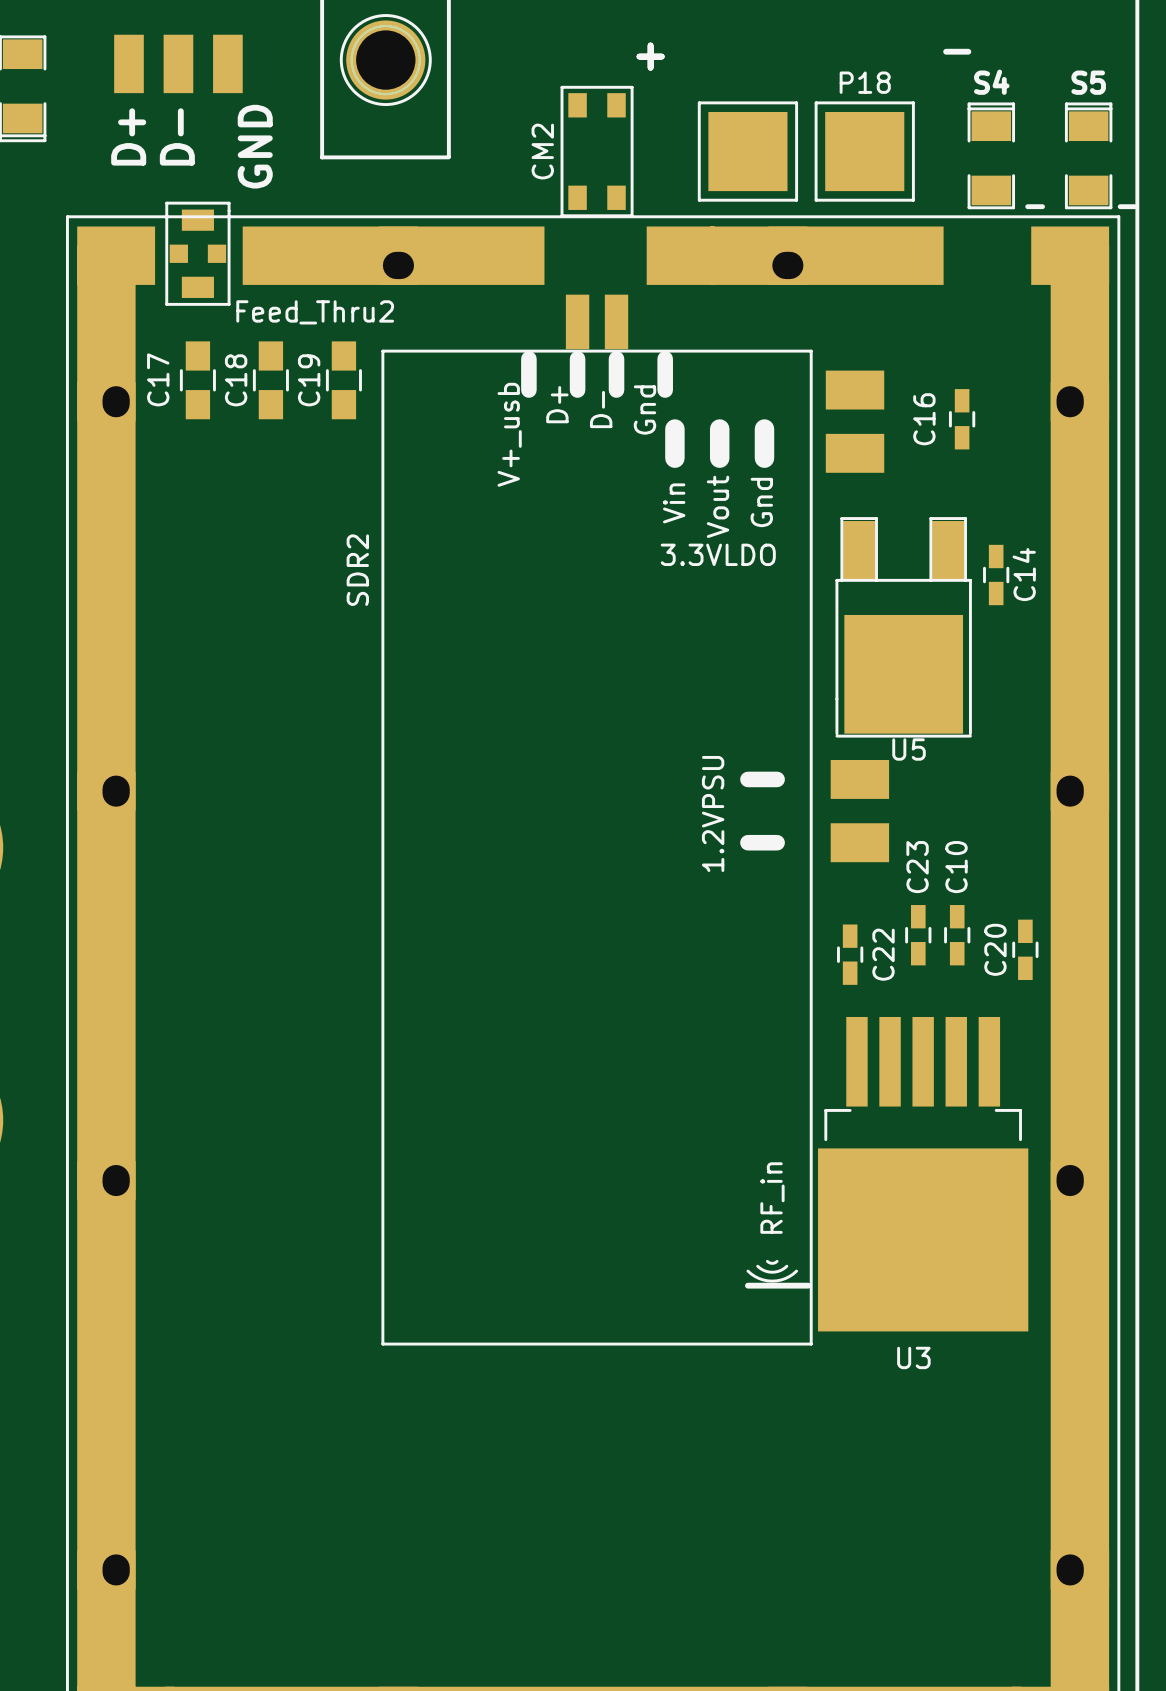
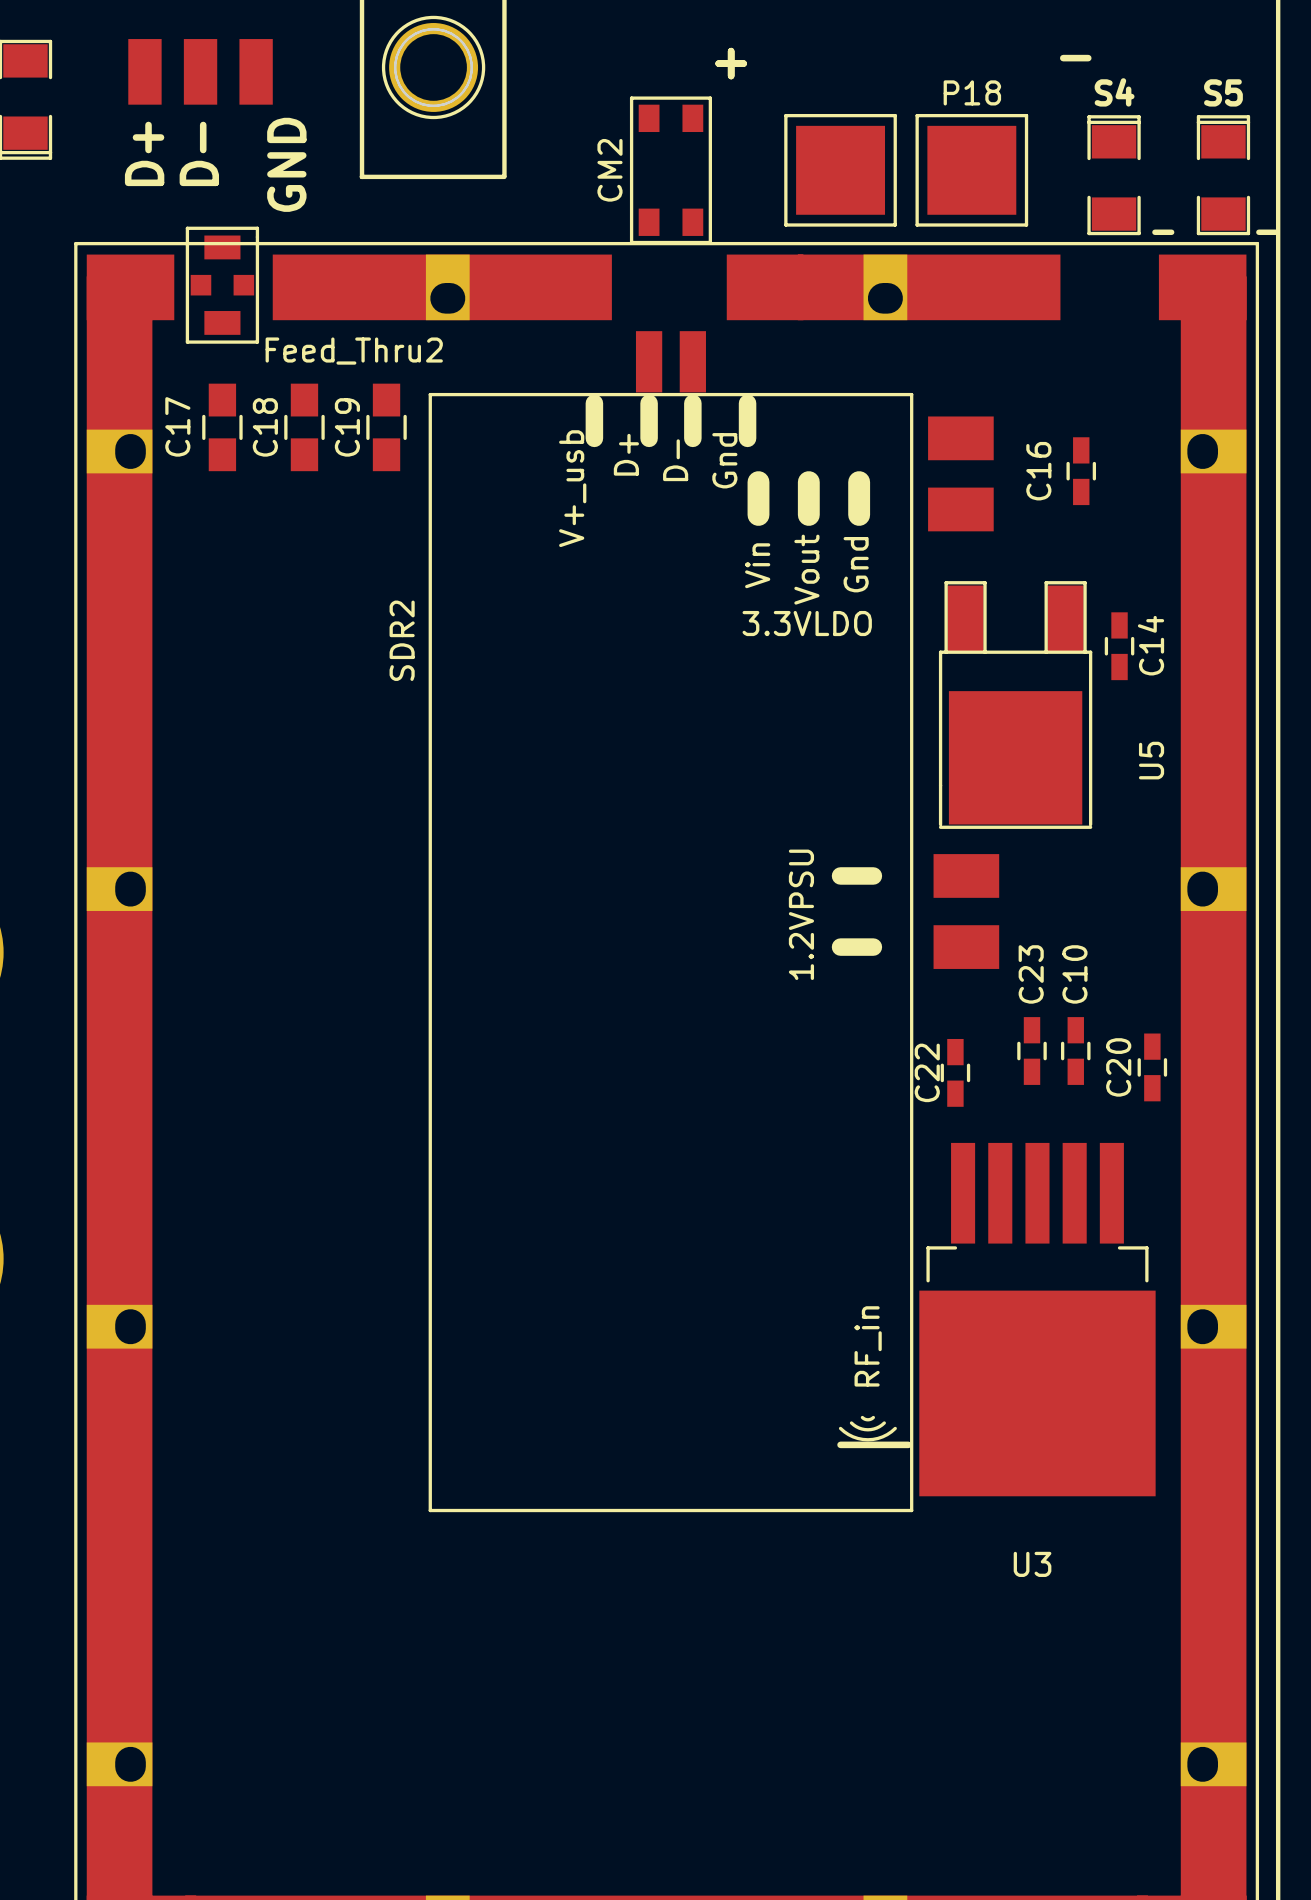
U5 name rotation: 0° (909, 749) -> 90° counterclockwise (1151, 760)
U5 name position: U5 (909, 749) -> U5 (1151, 760)
C22 name position: C22 (883, 954) -> C22 (927, 1072)
U3 name position: U3 (913, 1357) -> U3 (1032, 1564)

